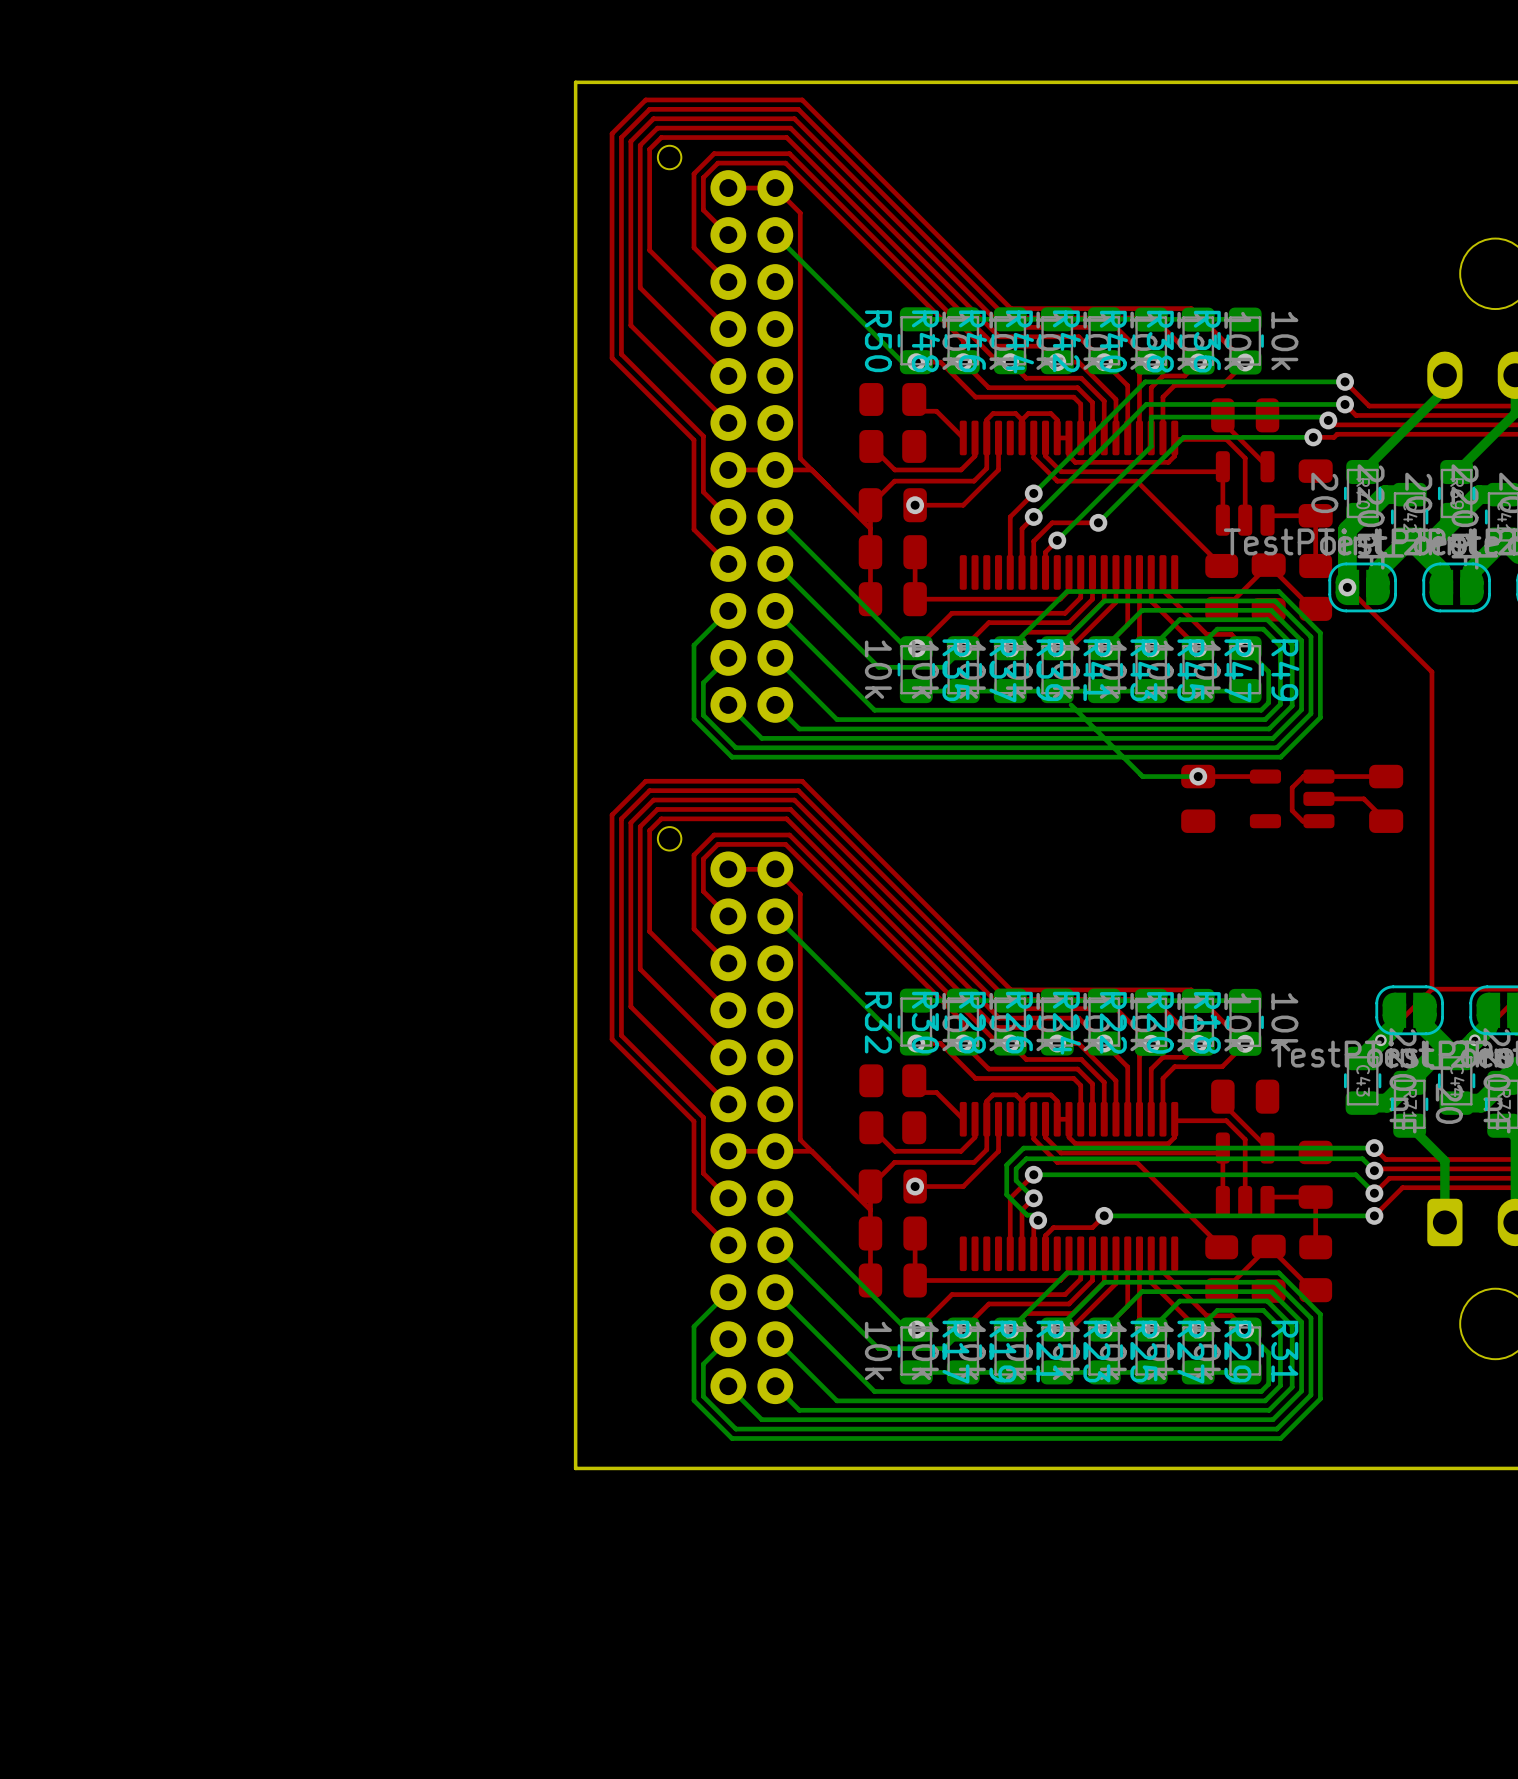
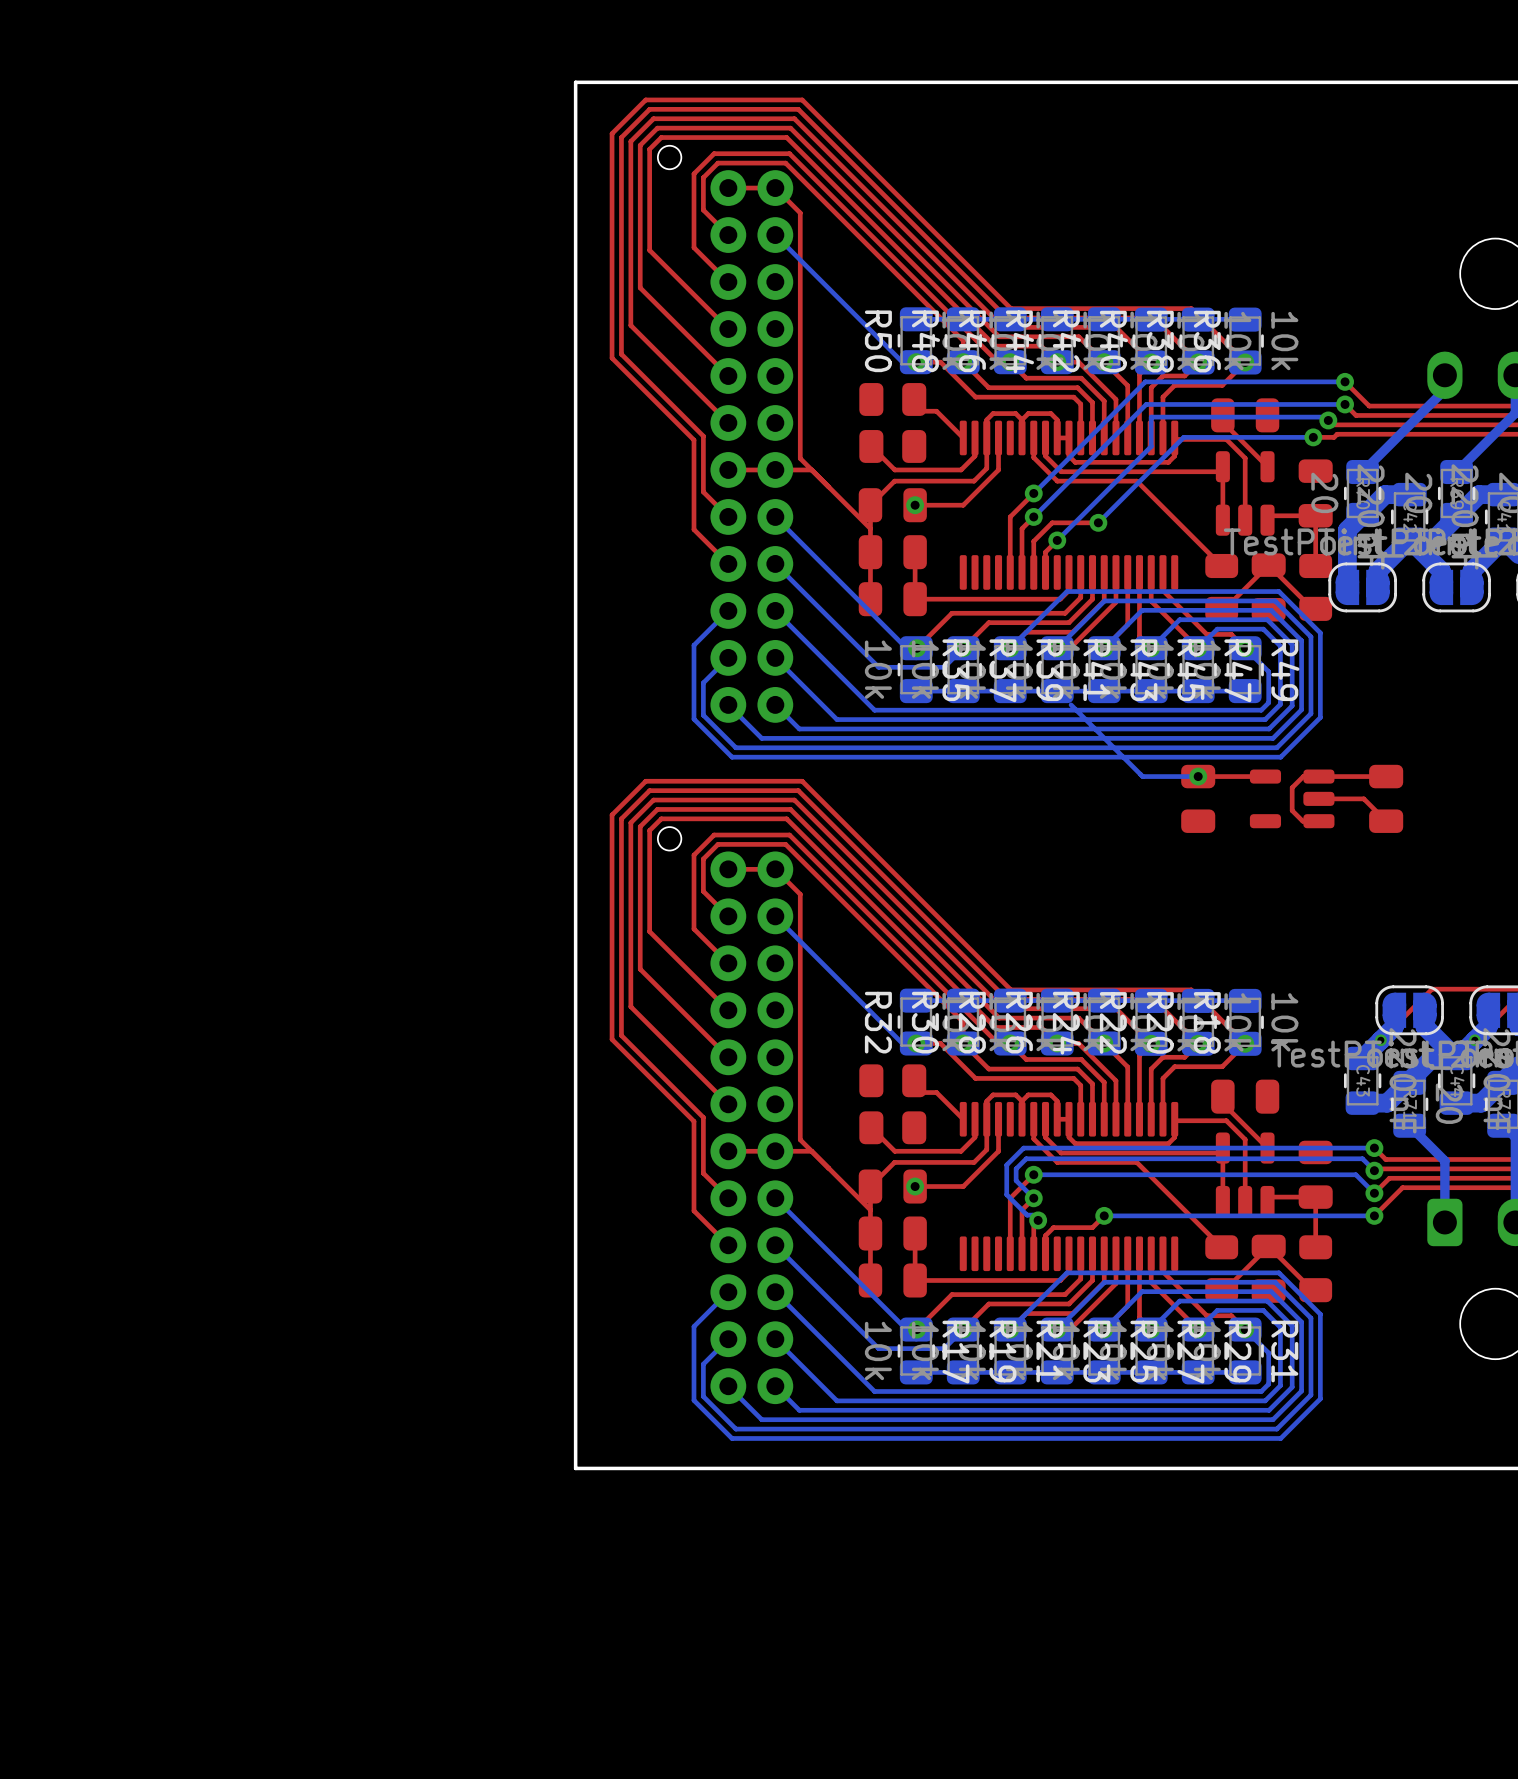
top track: (1347, 587) (1431, 672) (1431, 989) -> none
via: (1347, 587) -> none

